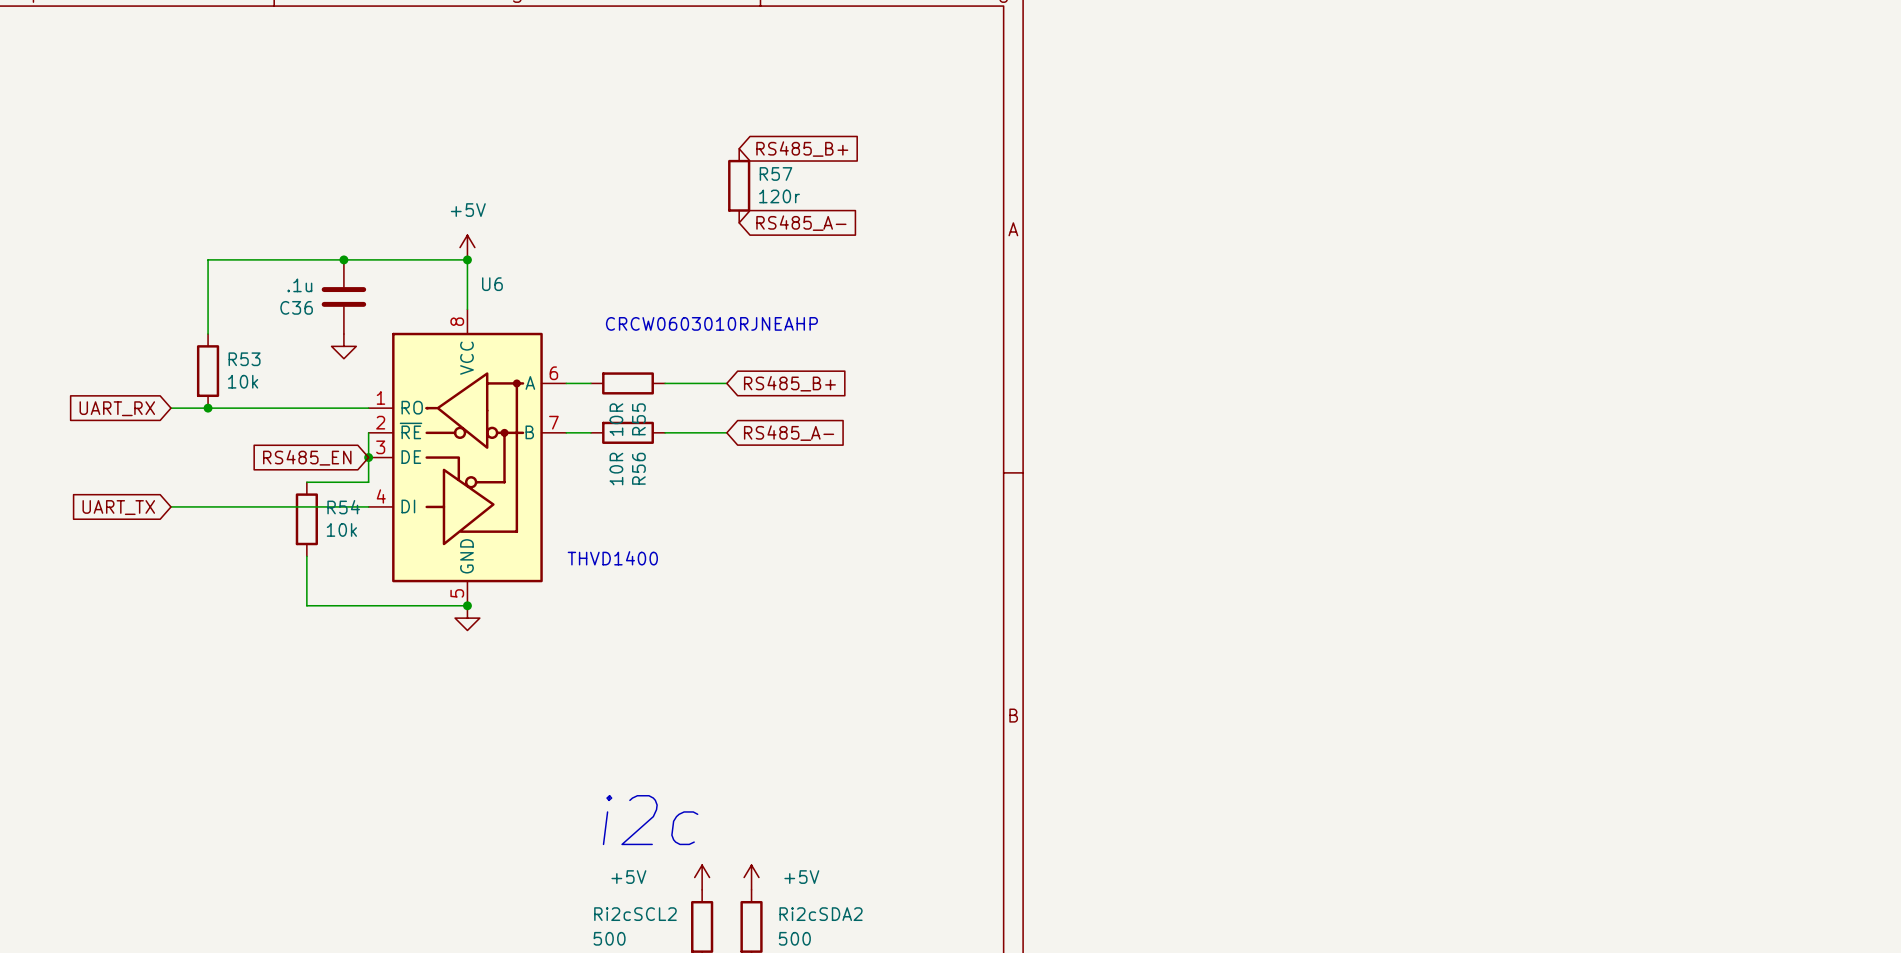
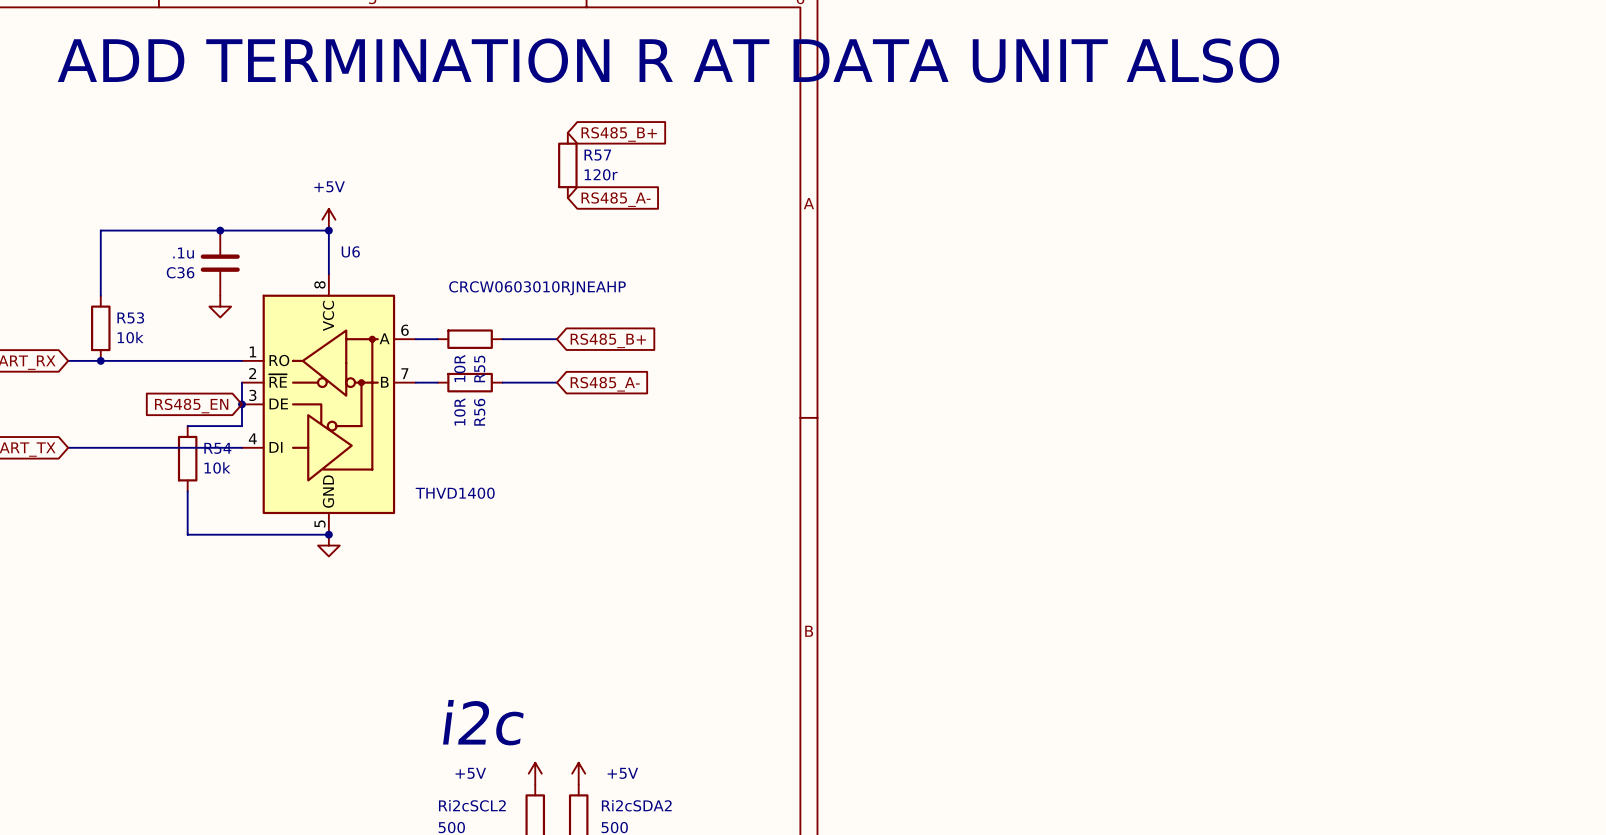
text: none -> ADD TERMINATION R AT DATA UNIT ALSO (668, 60)

